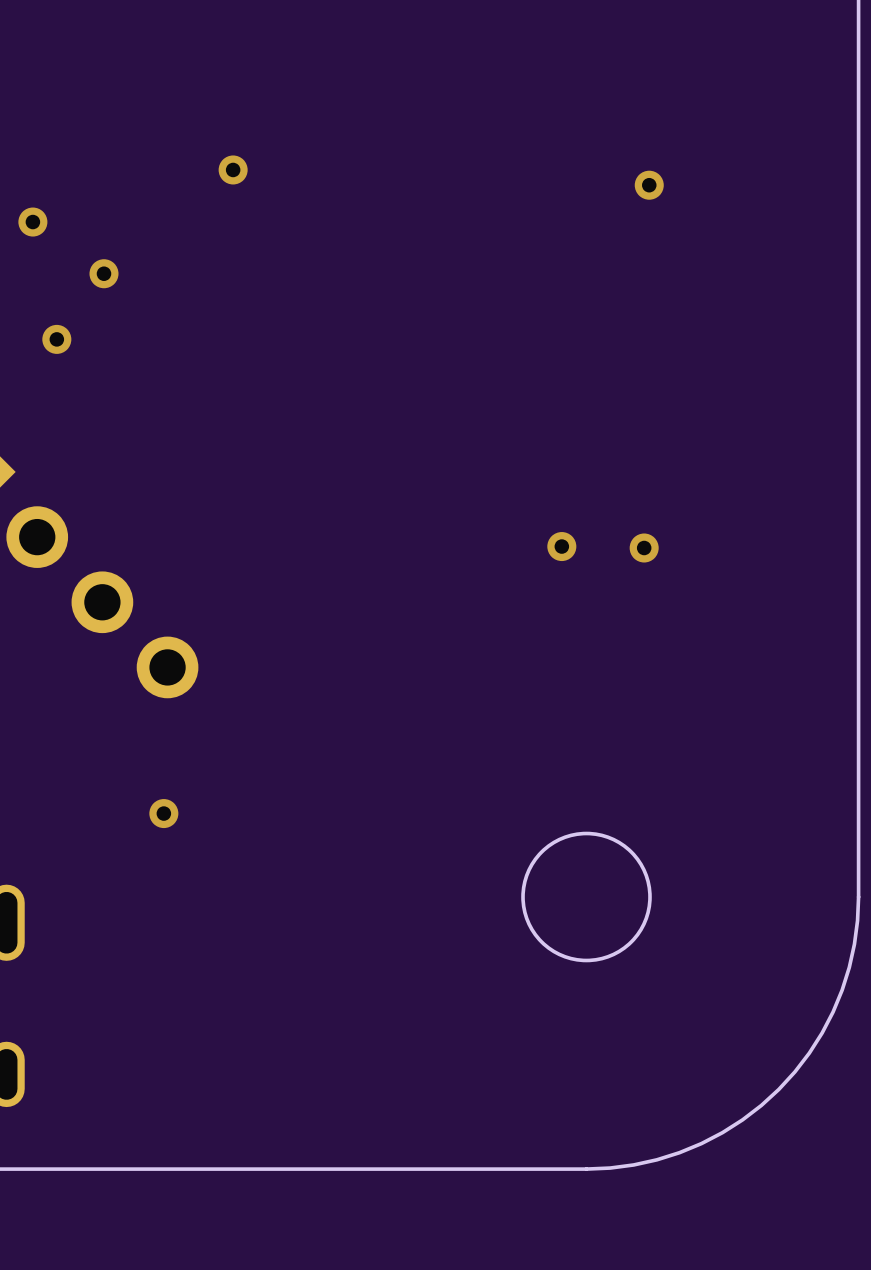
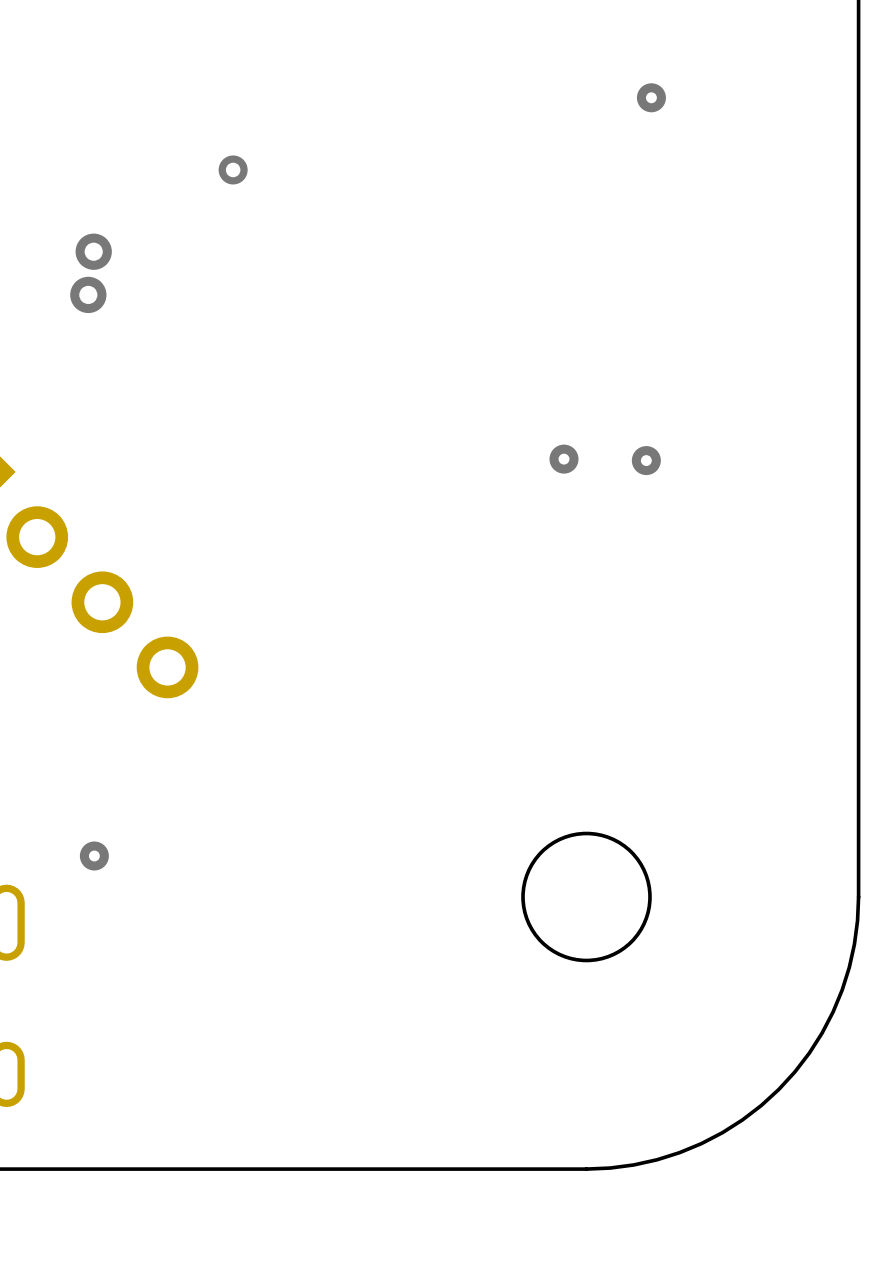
via: none -> (651, 97)
via: (649, 185) -> none
via: (32, 222) -> none
via: none -> (93, 251)
via: (103, 273) -> none
via: none -> (88, 294)
via: (56, 339) -> none
via: none -> (564, 459)
via: none -> (646, 460)
via: (561, 546) -> none
via: (644, 548) -> none
via: (163, 813) -> none
via: none -> (94, 856)

